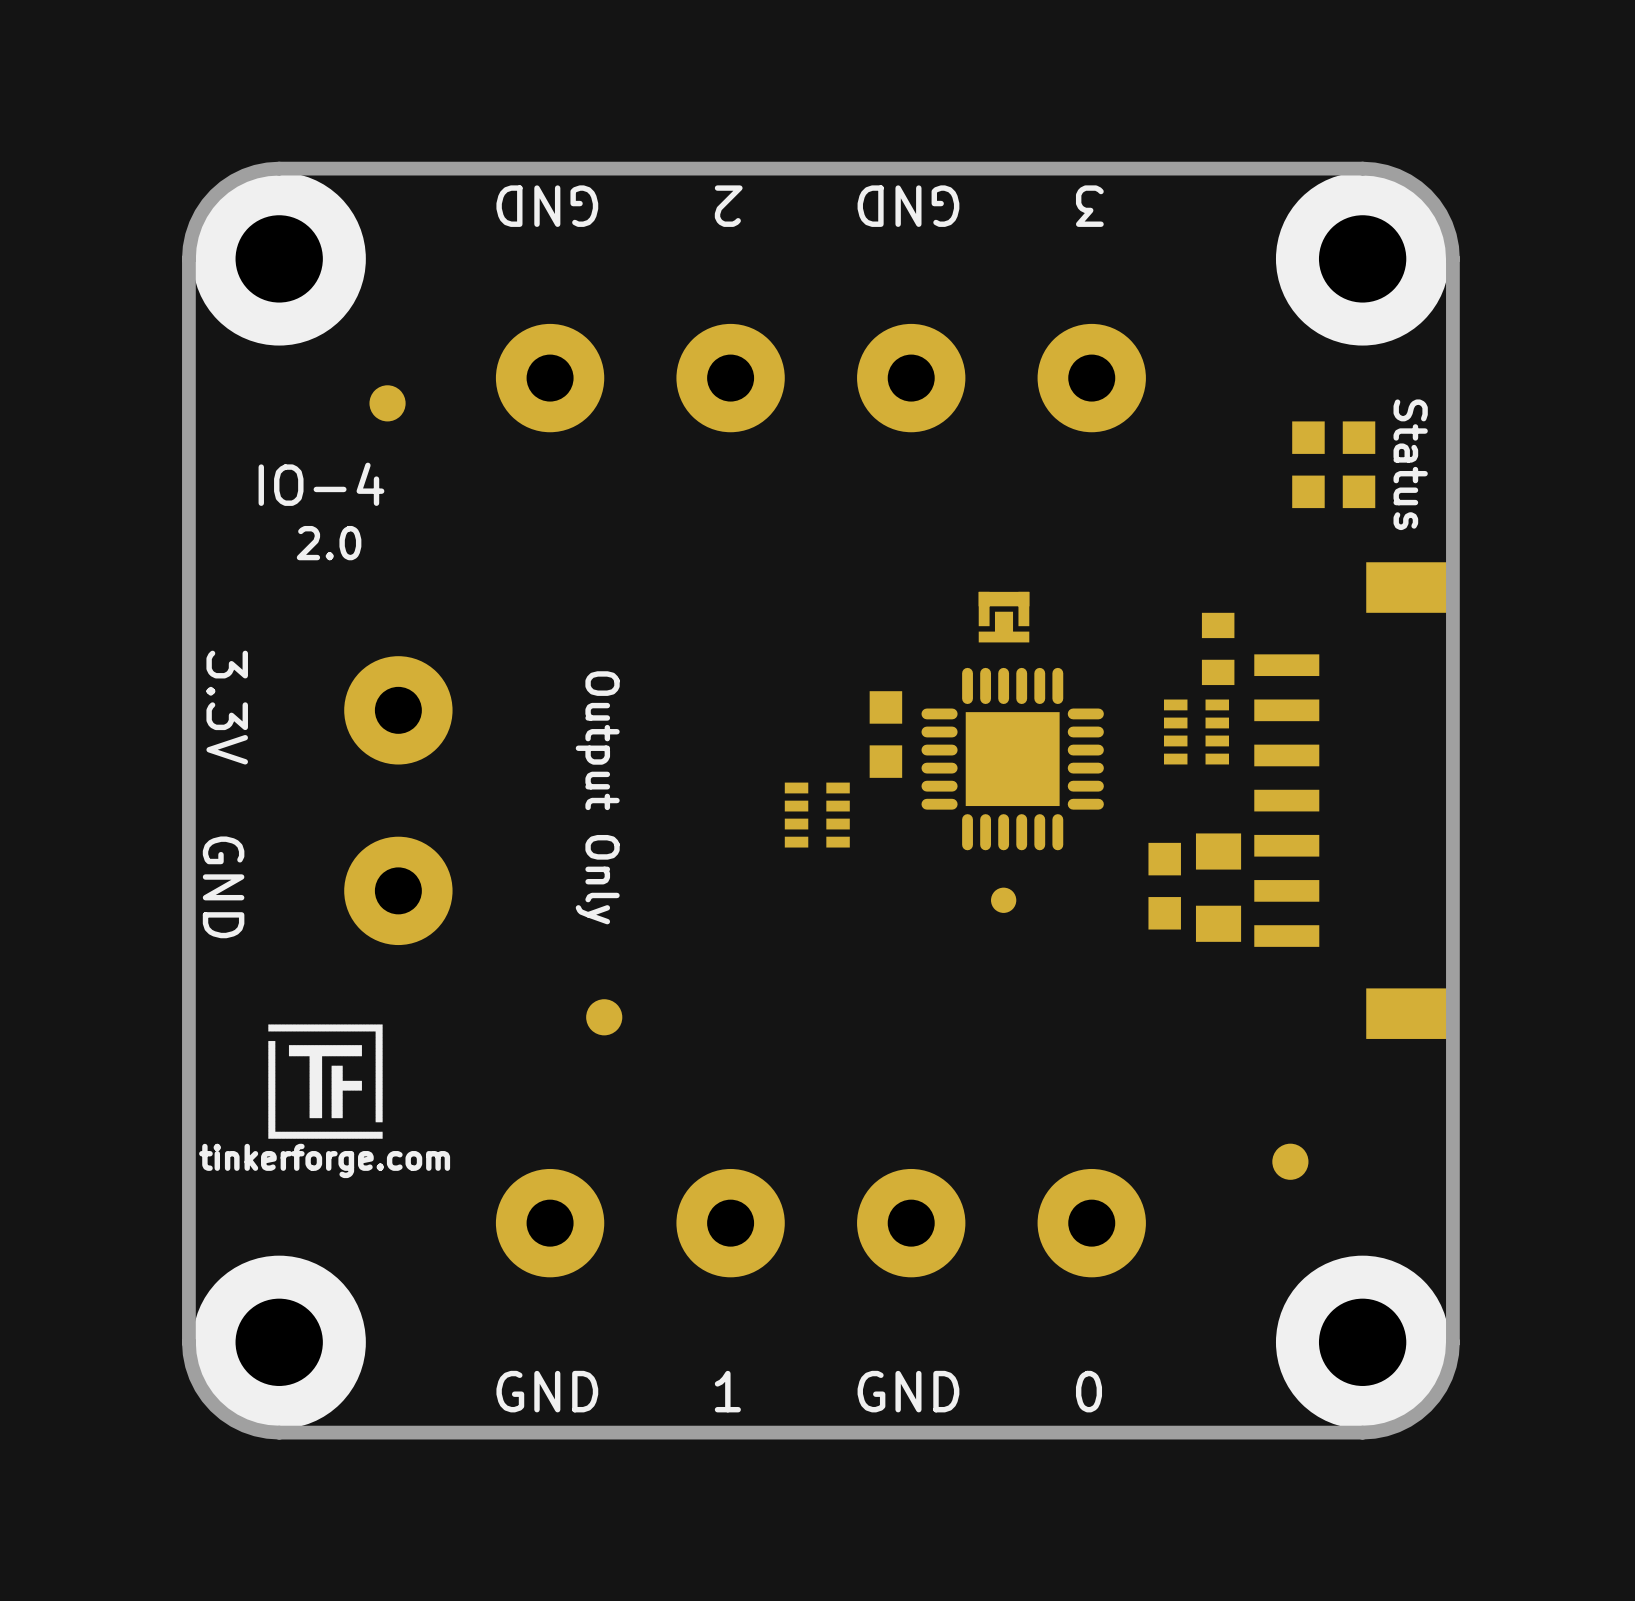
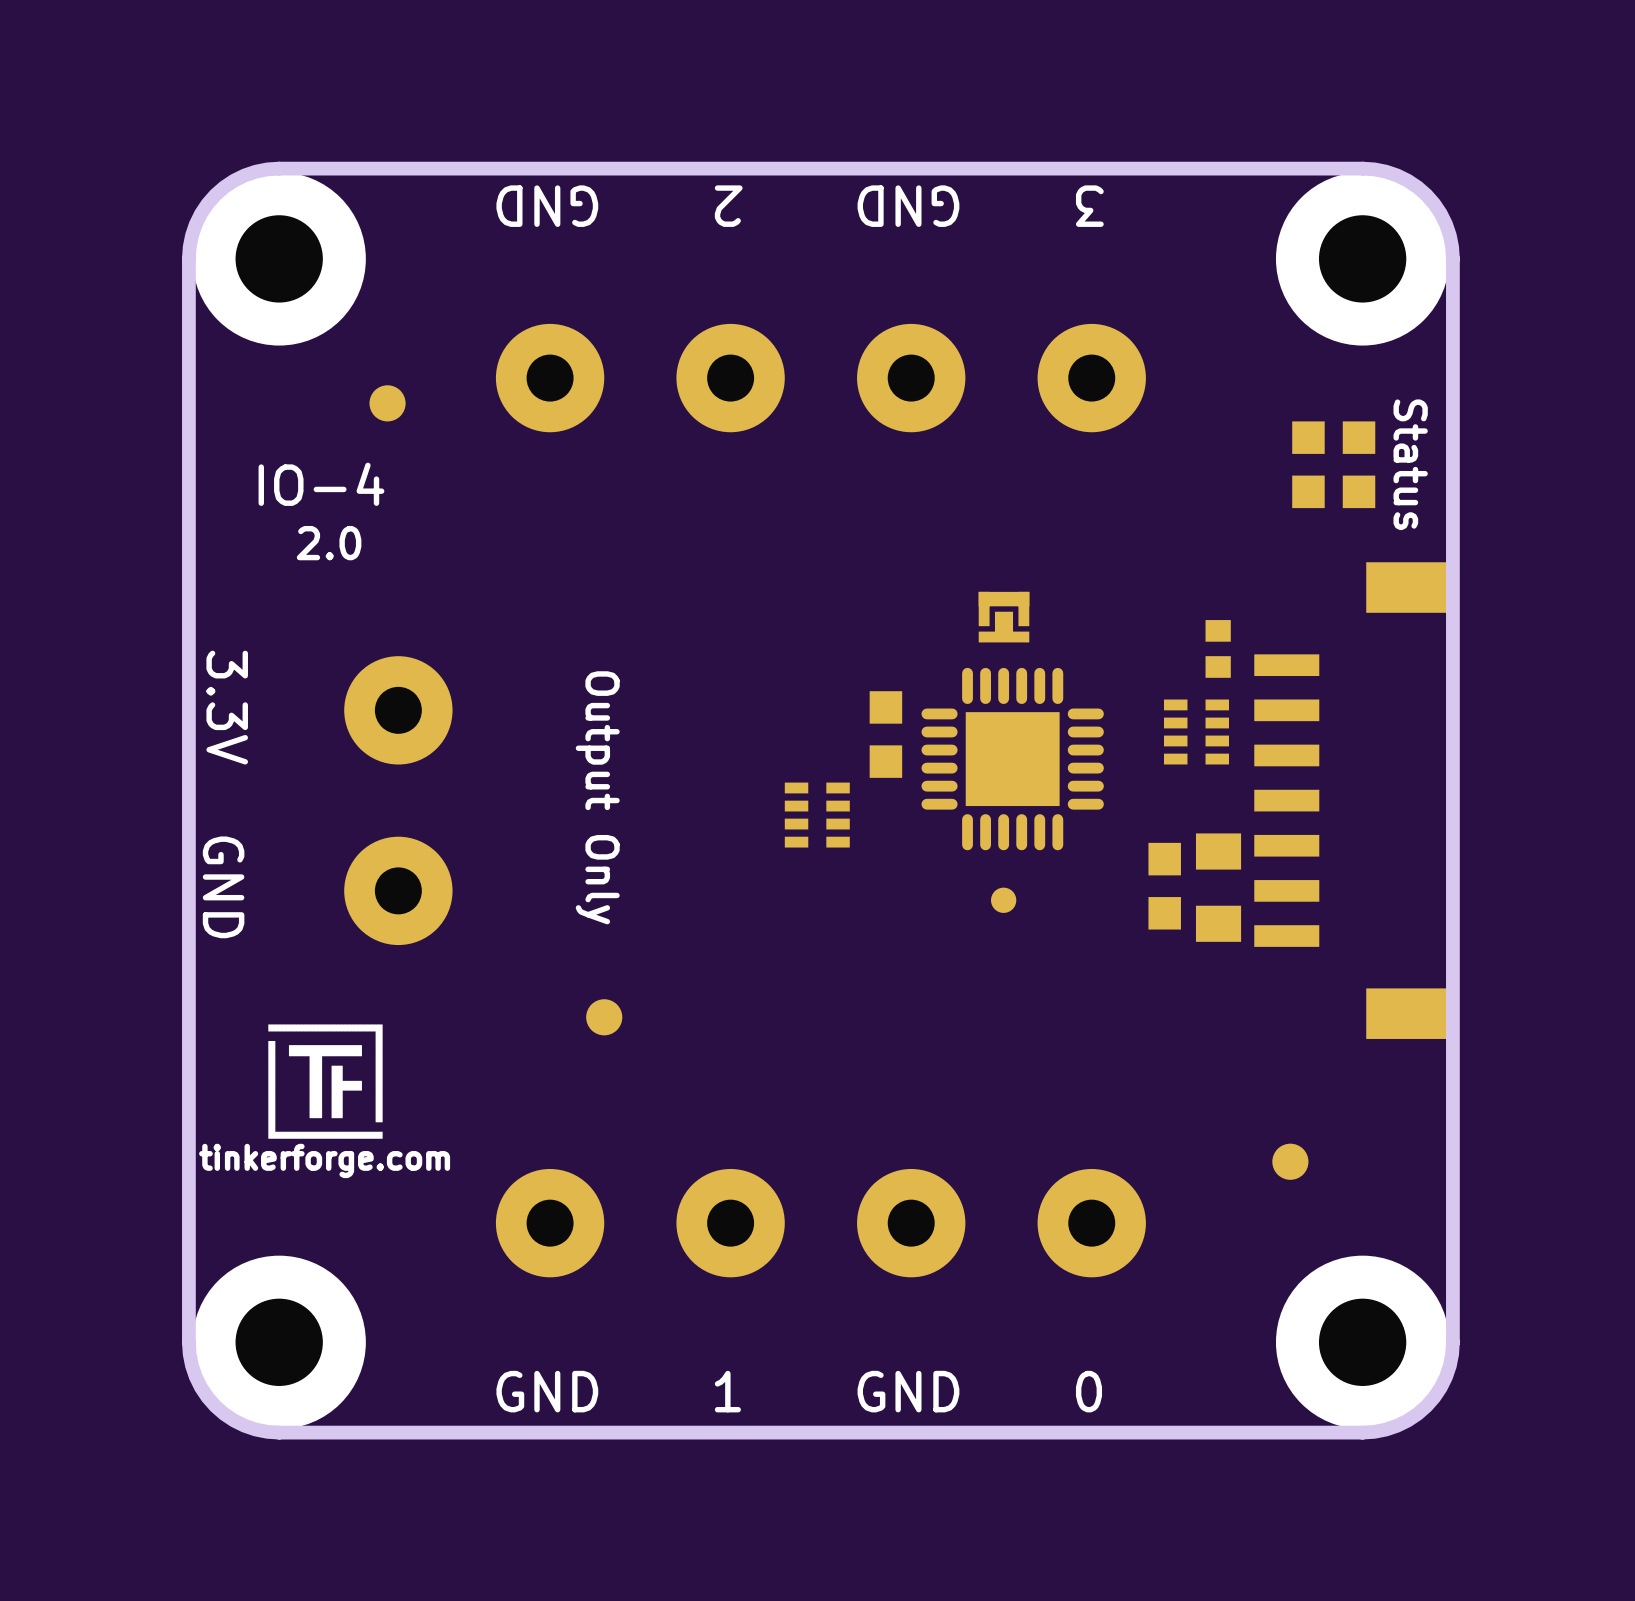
part footprint: [1201, 612, 1235, 686] -> [1205, 620, 1231, 678]

